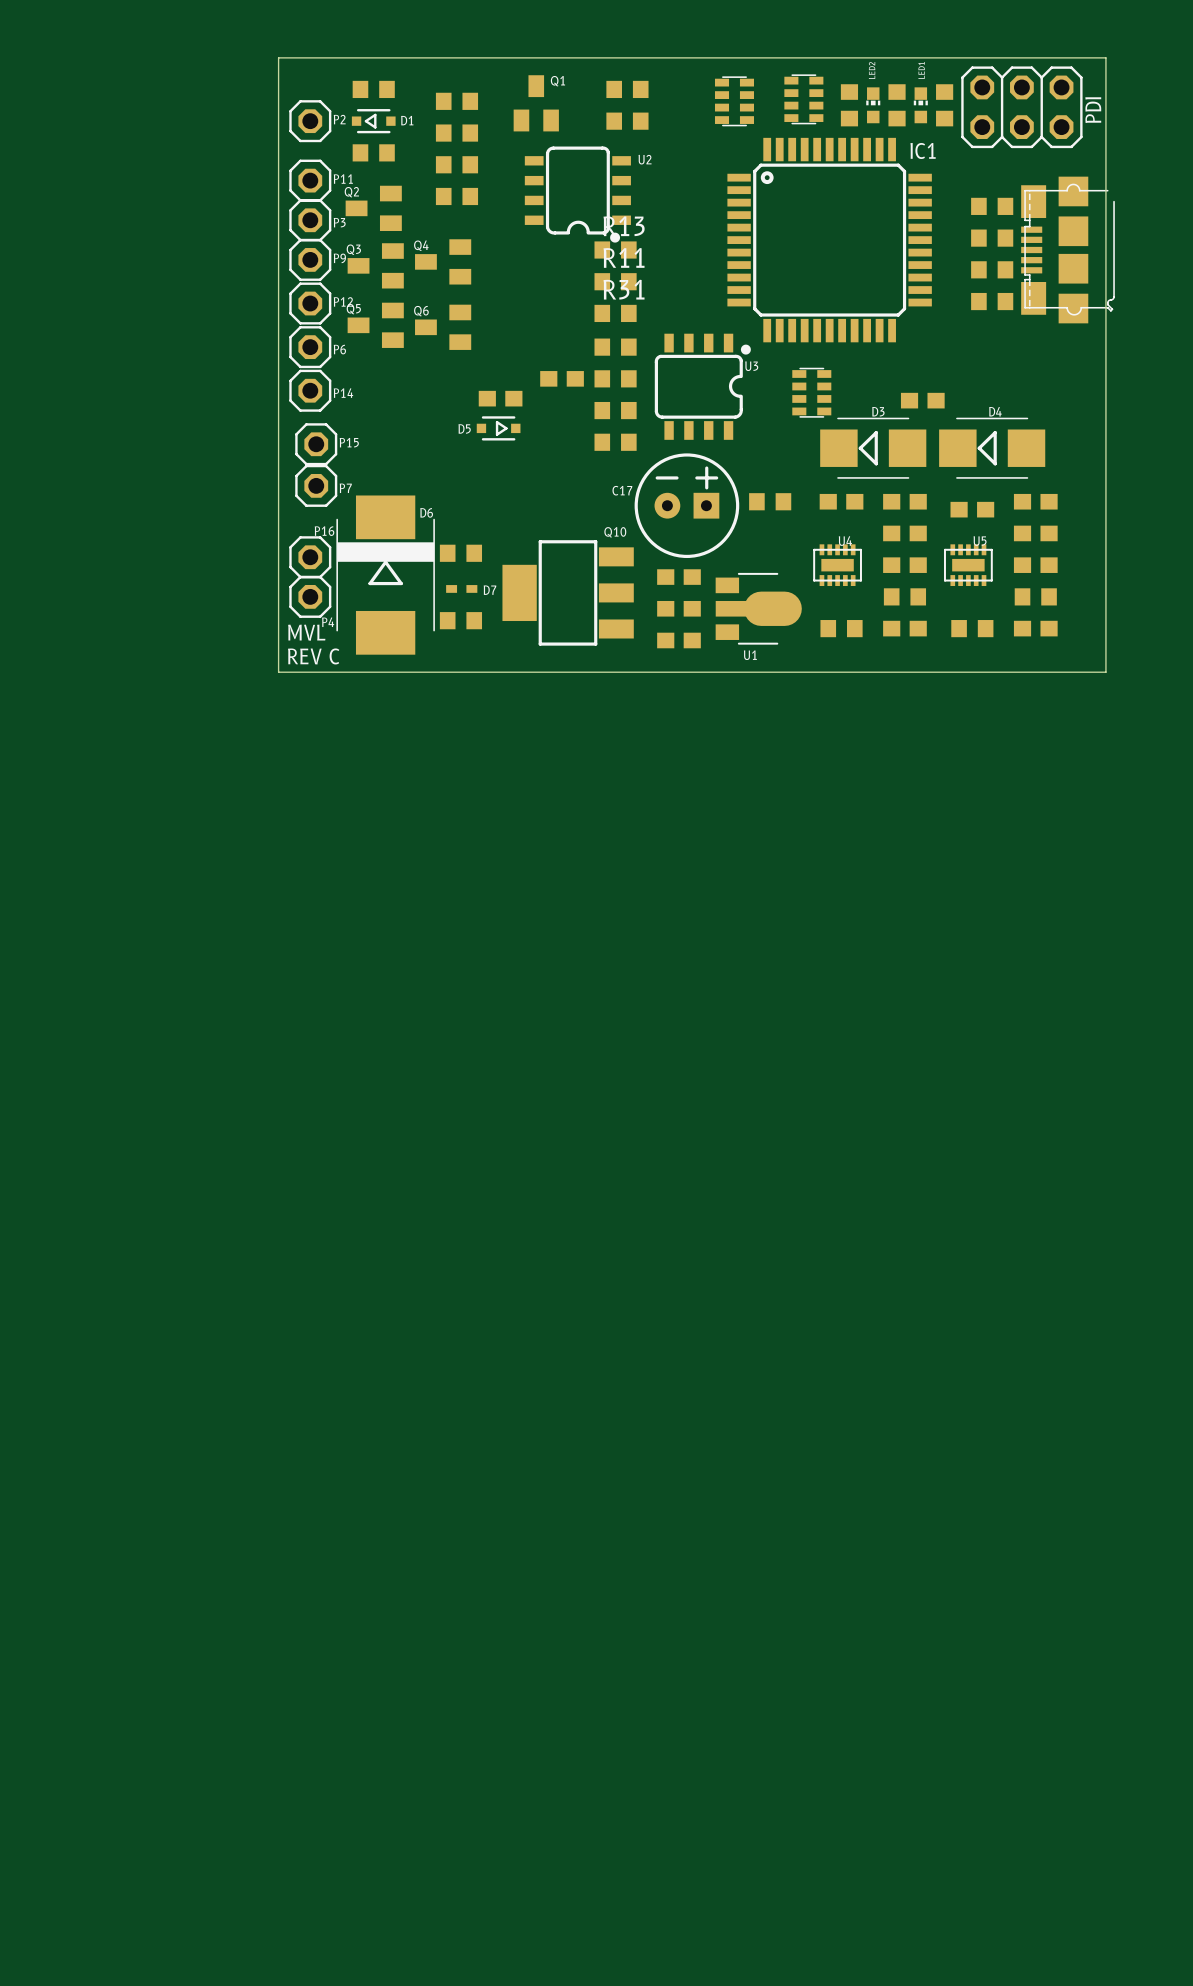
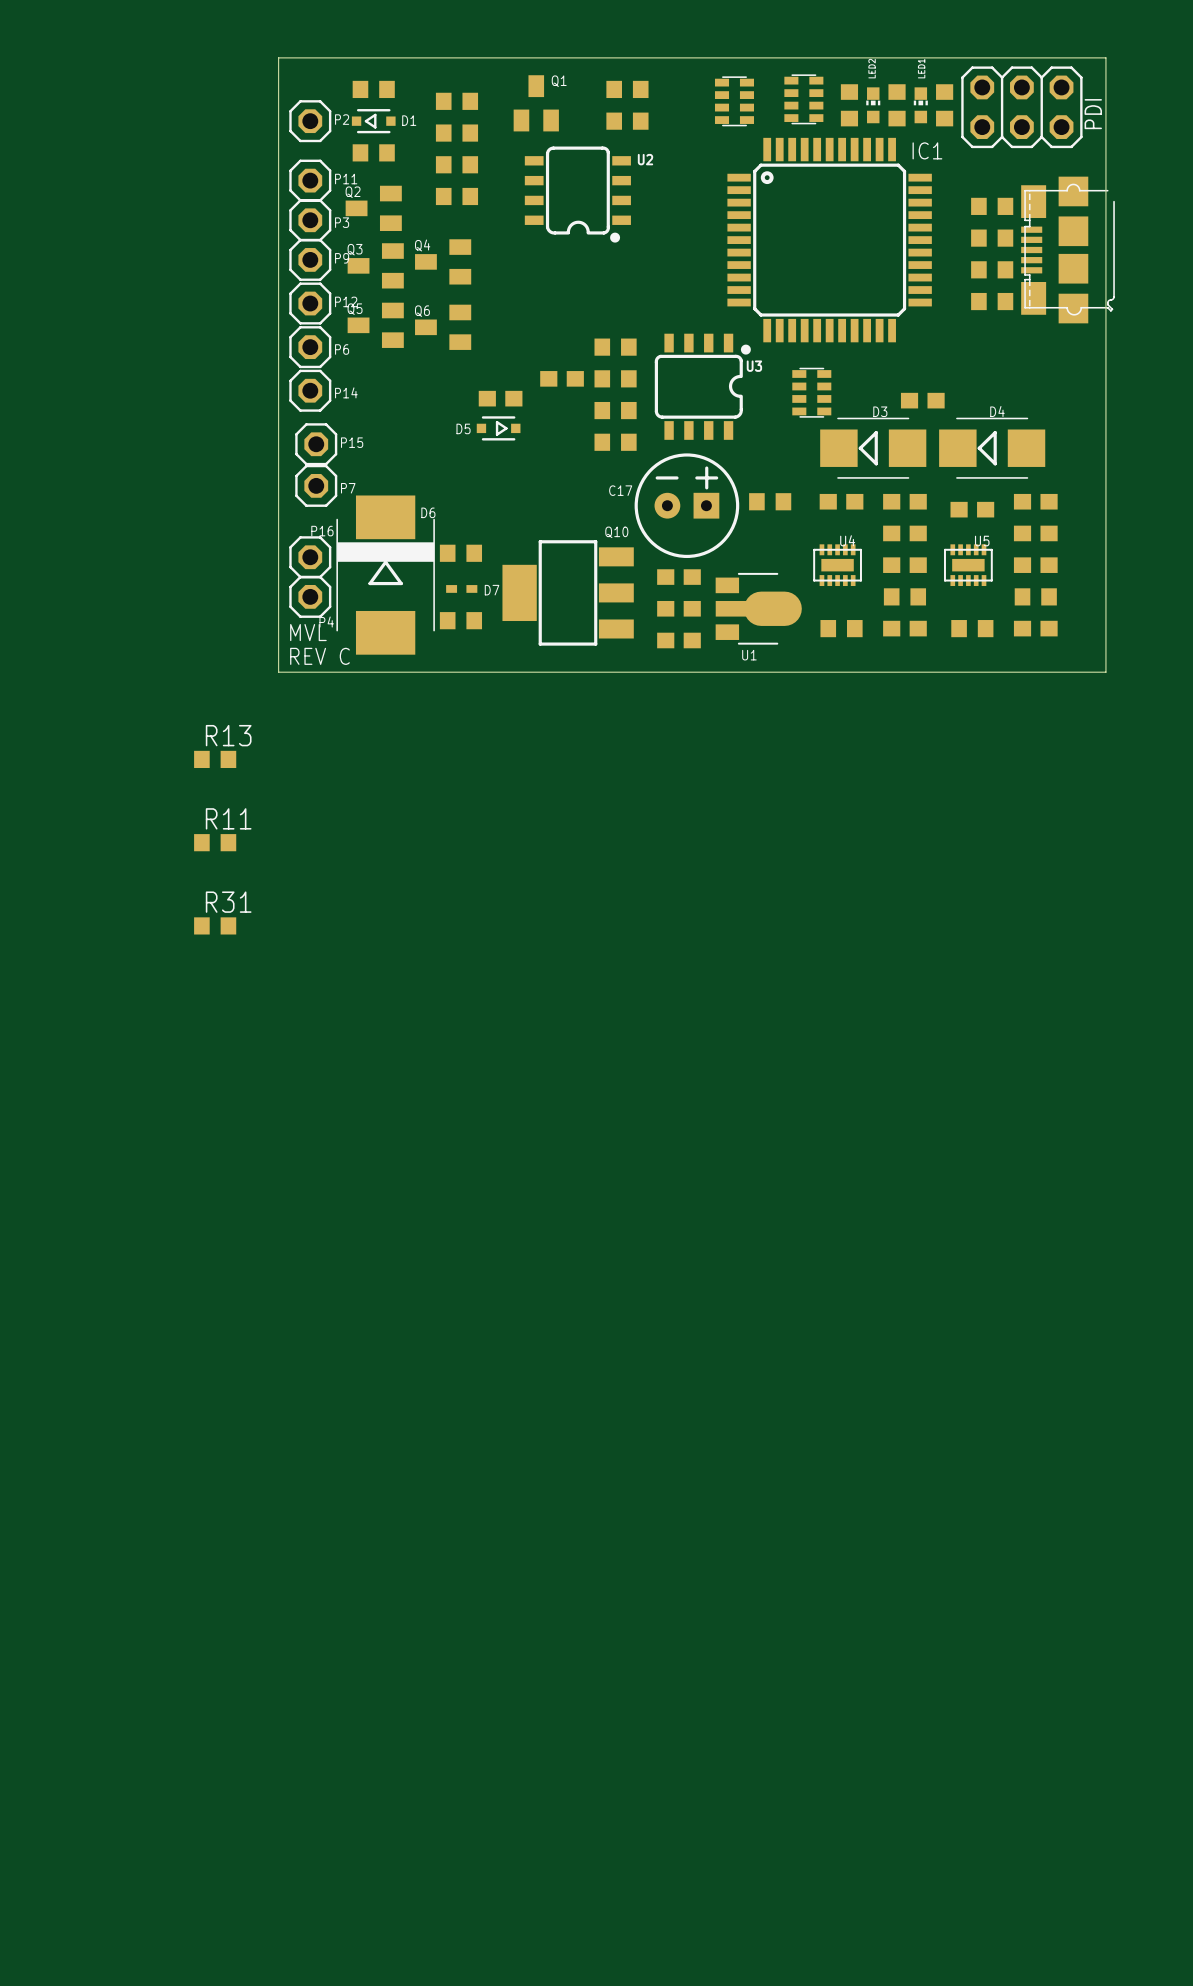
R13 position: (615, 250) -> (215, 759)
R11 position: (615, 281) -> (215, 842)
R31 position: (615, 313) -> (215, 925)

